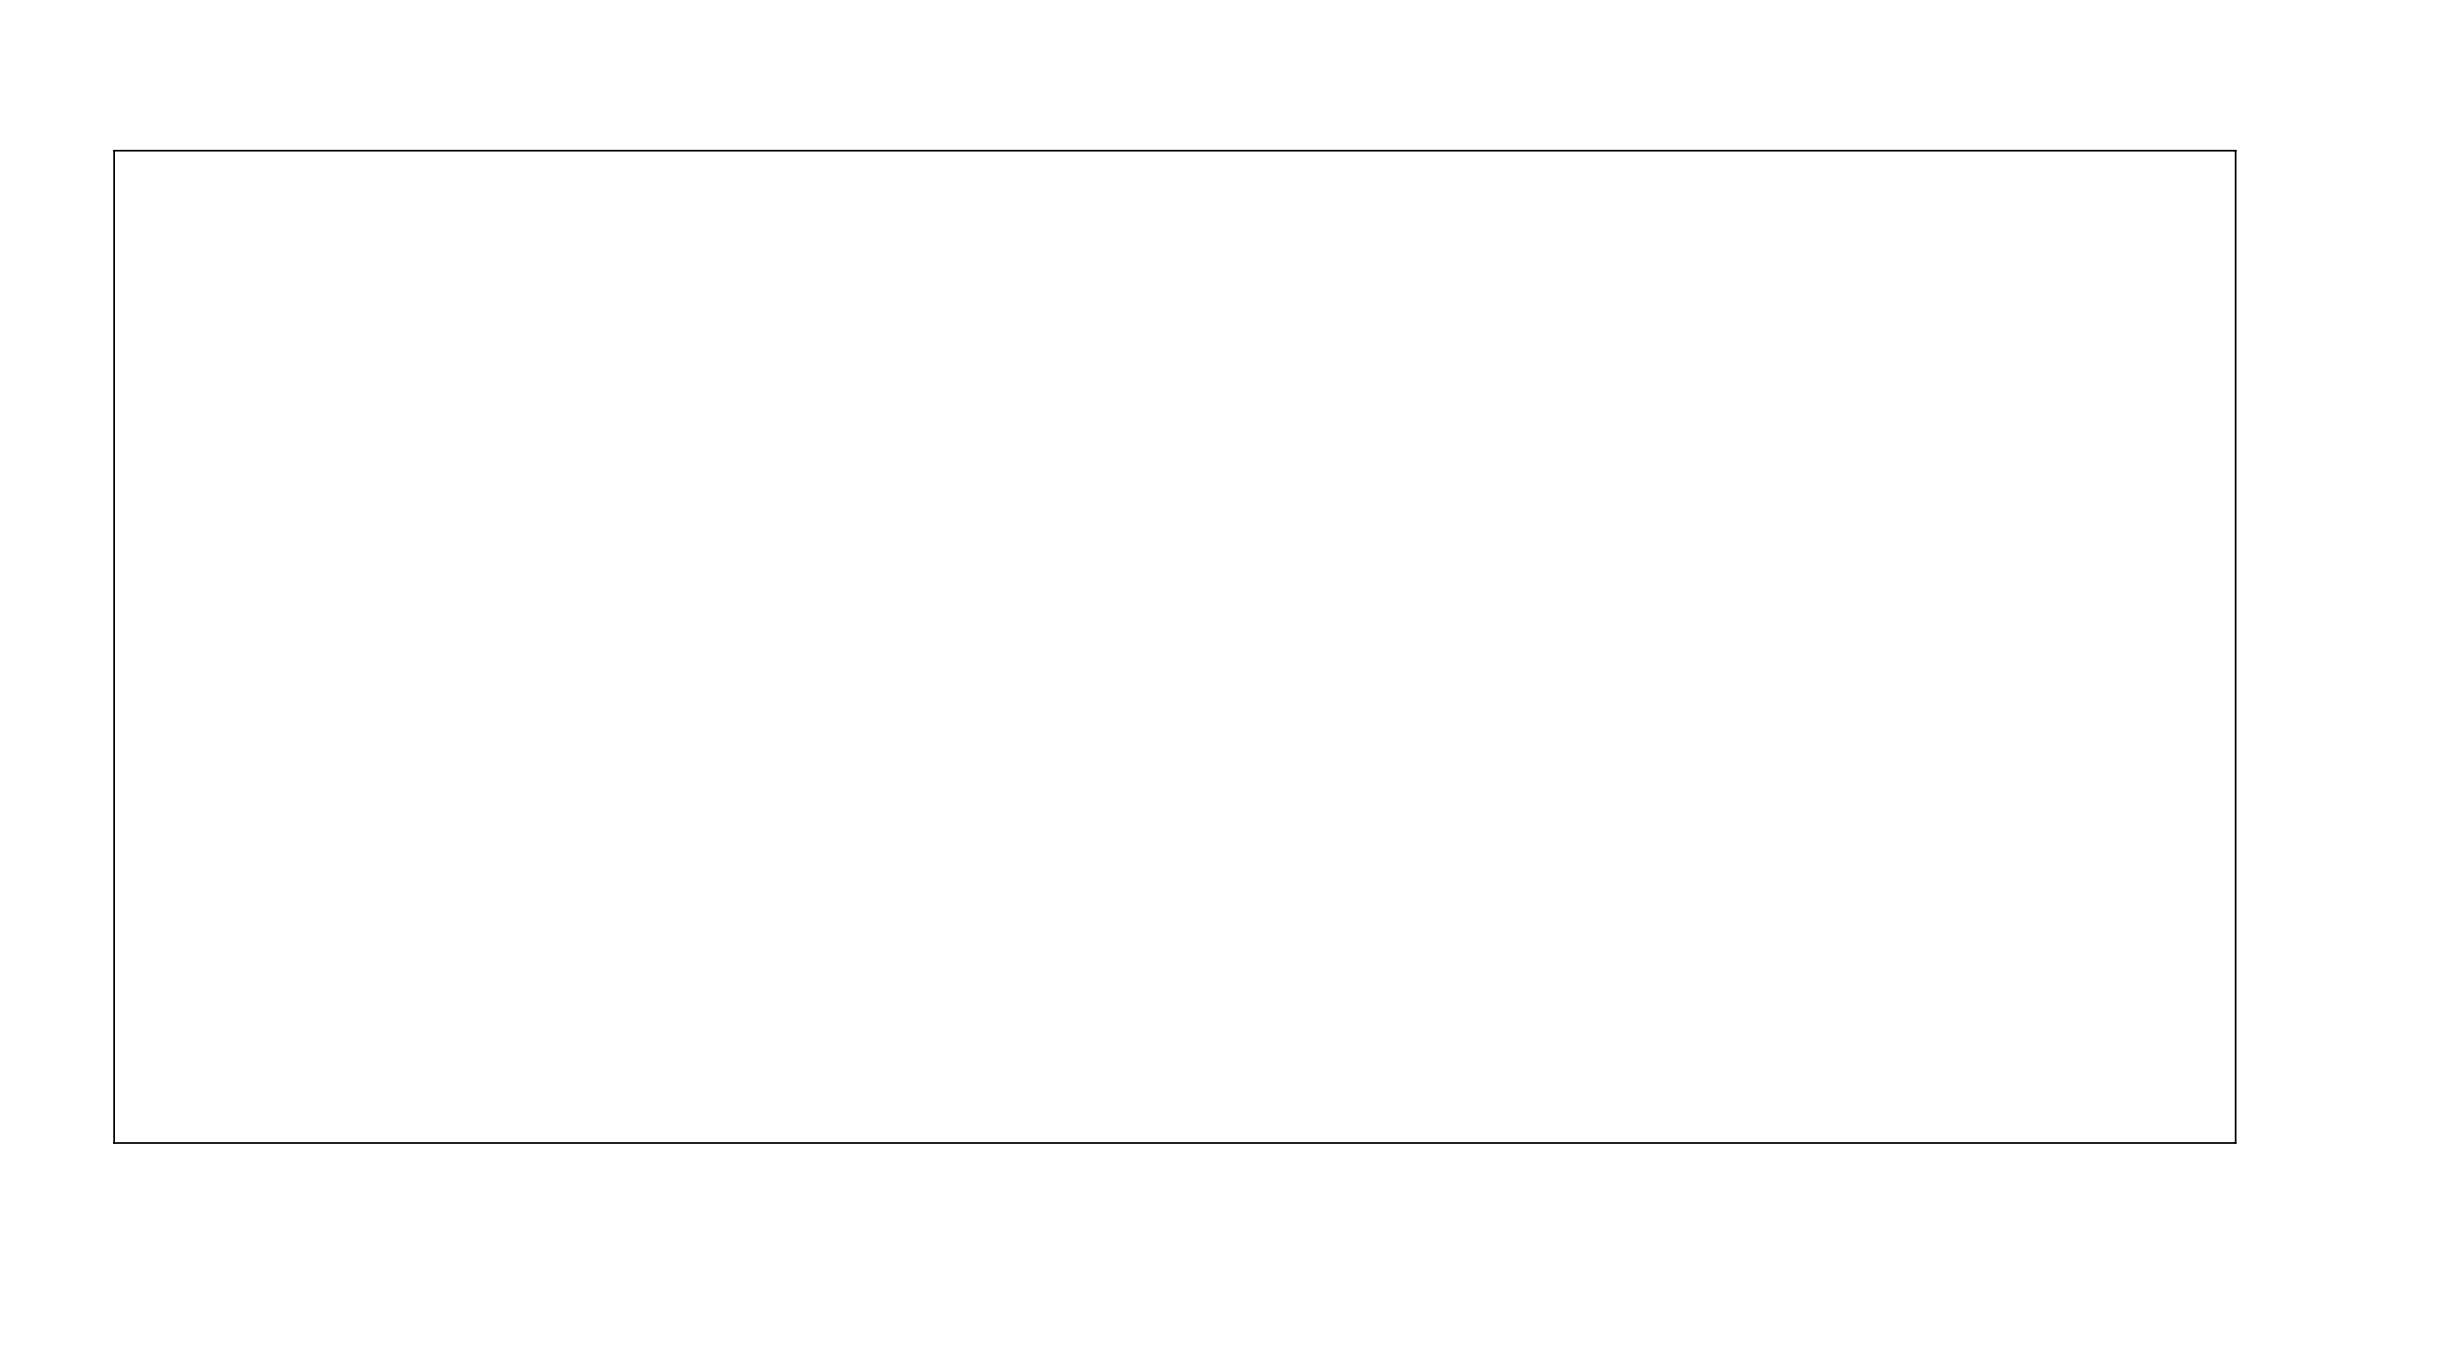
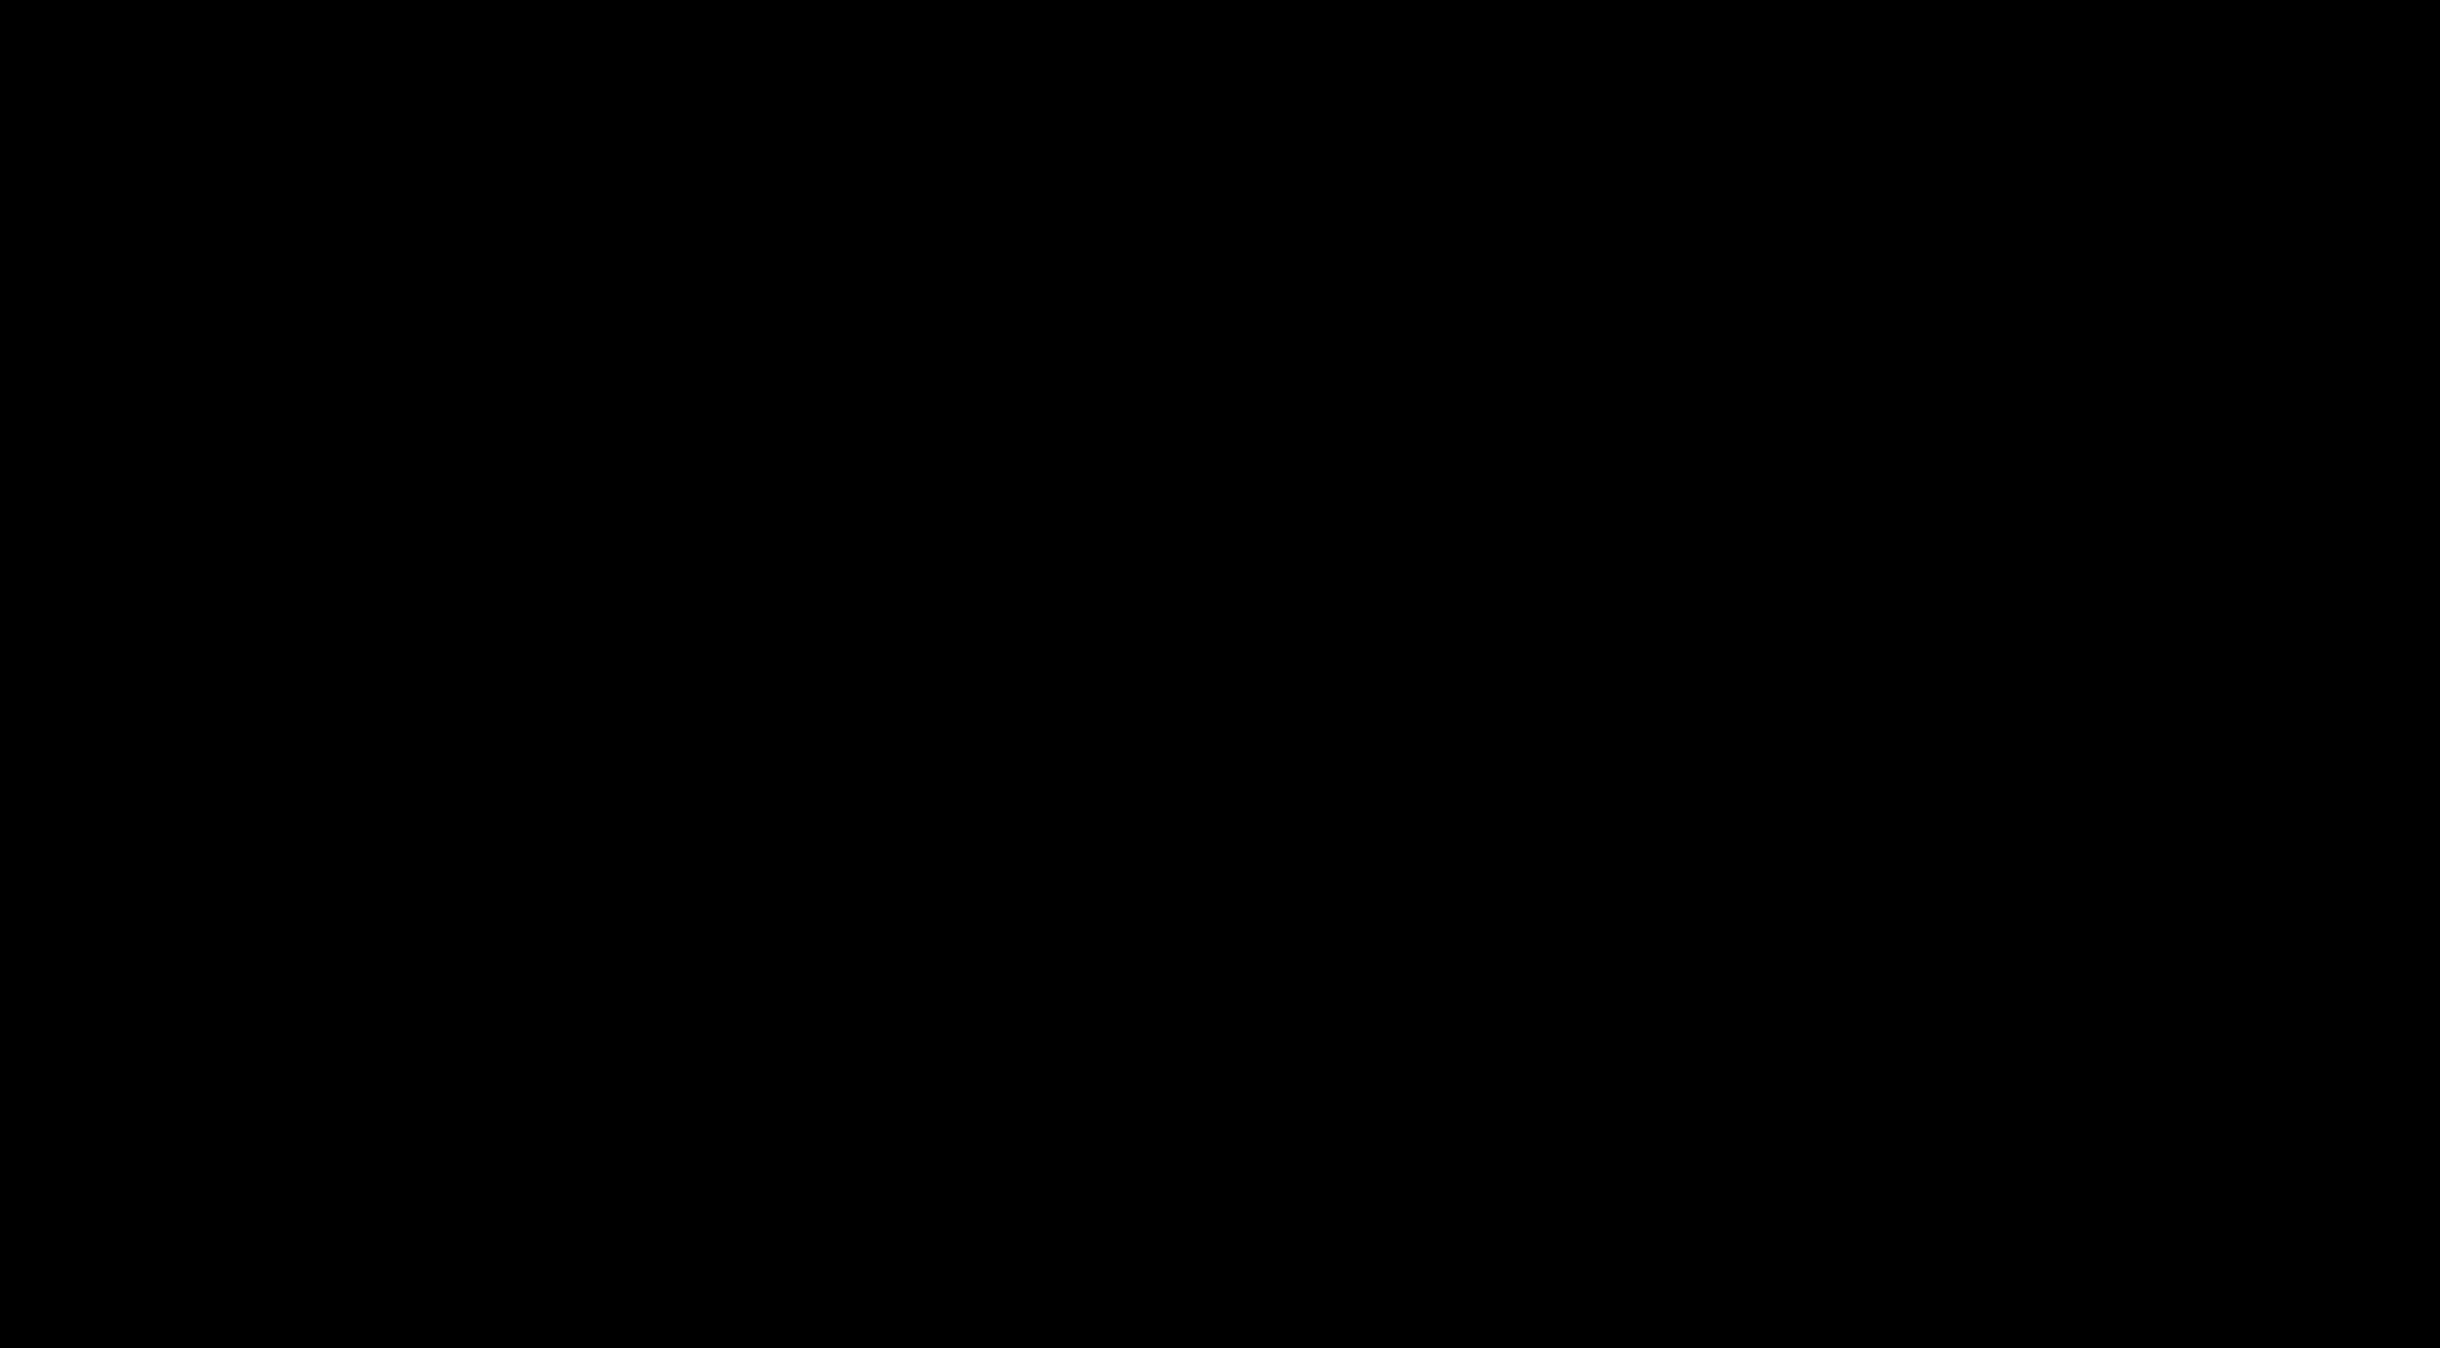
board edge: (2235, 150) (114, 150) (114, 1143) (2235, 1143) (2235, 150) -> none

